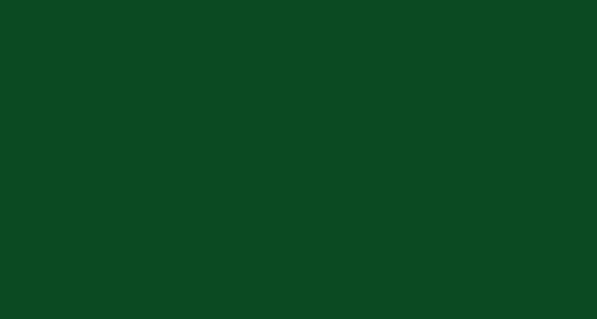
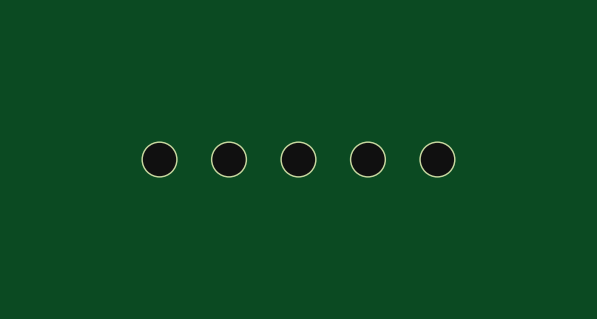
part: none -> (159, 159)
part: none -> (229, 159)
part: none -> (298, 159)
part: none -> (367, 159)
part: none -> (437, 159)

